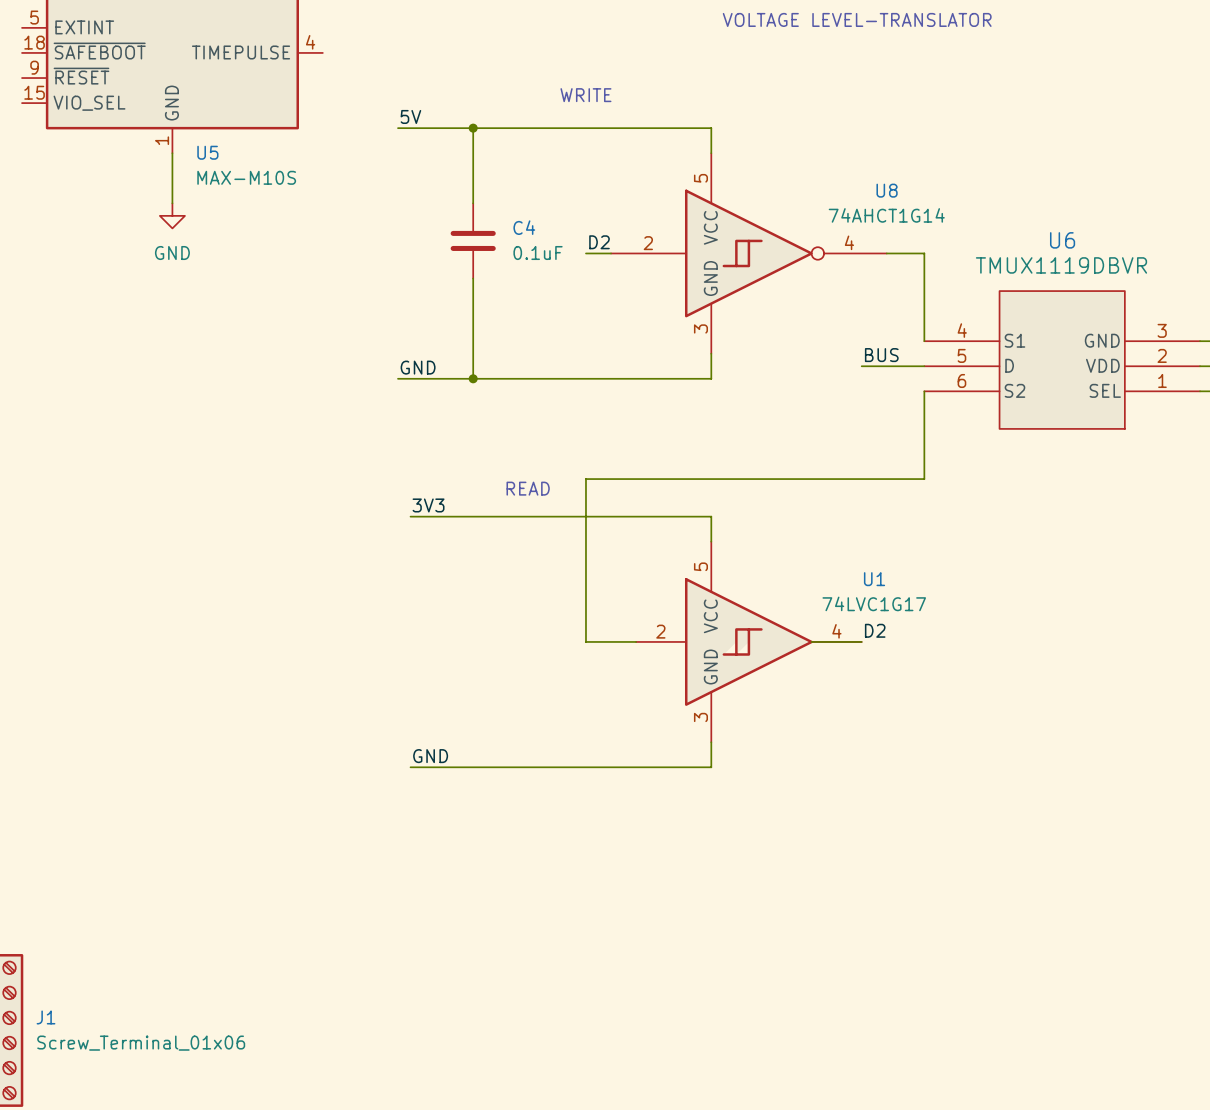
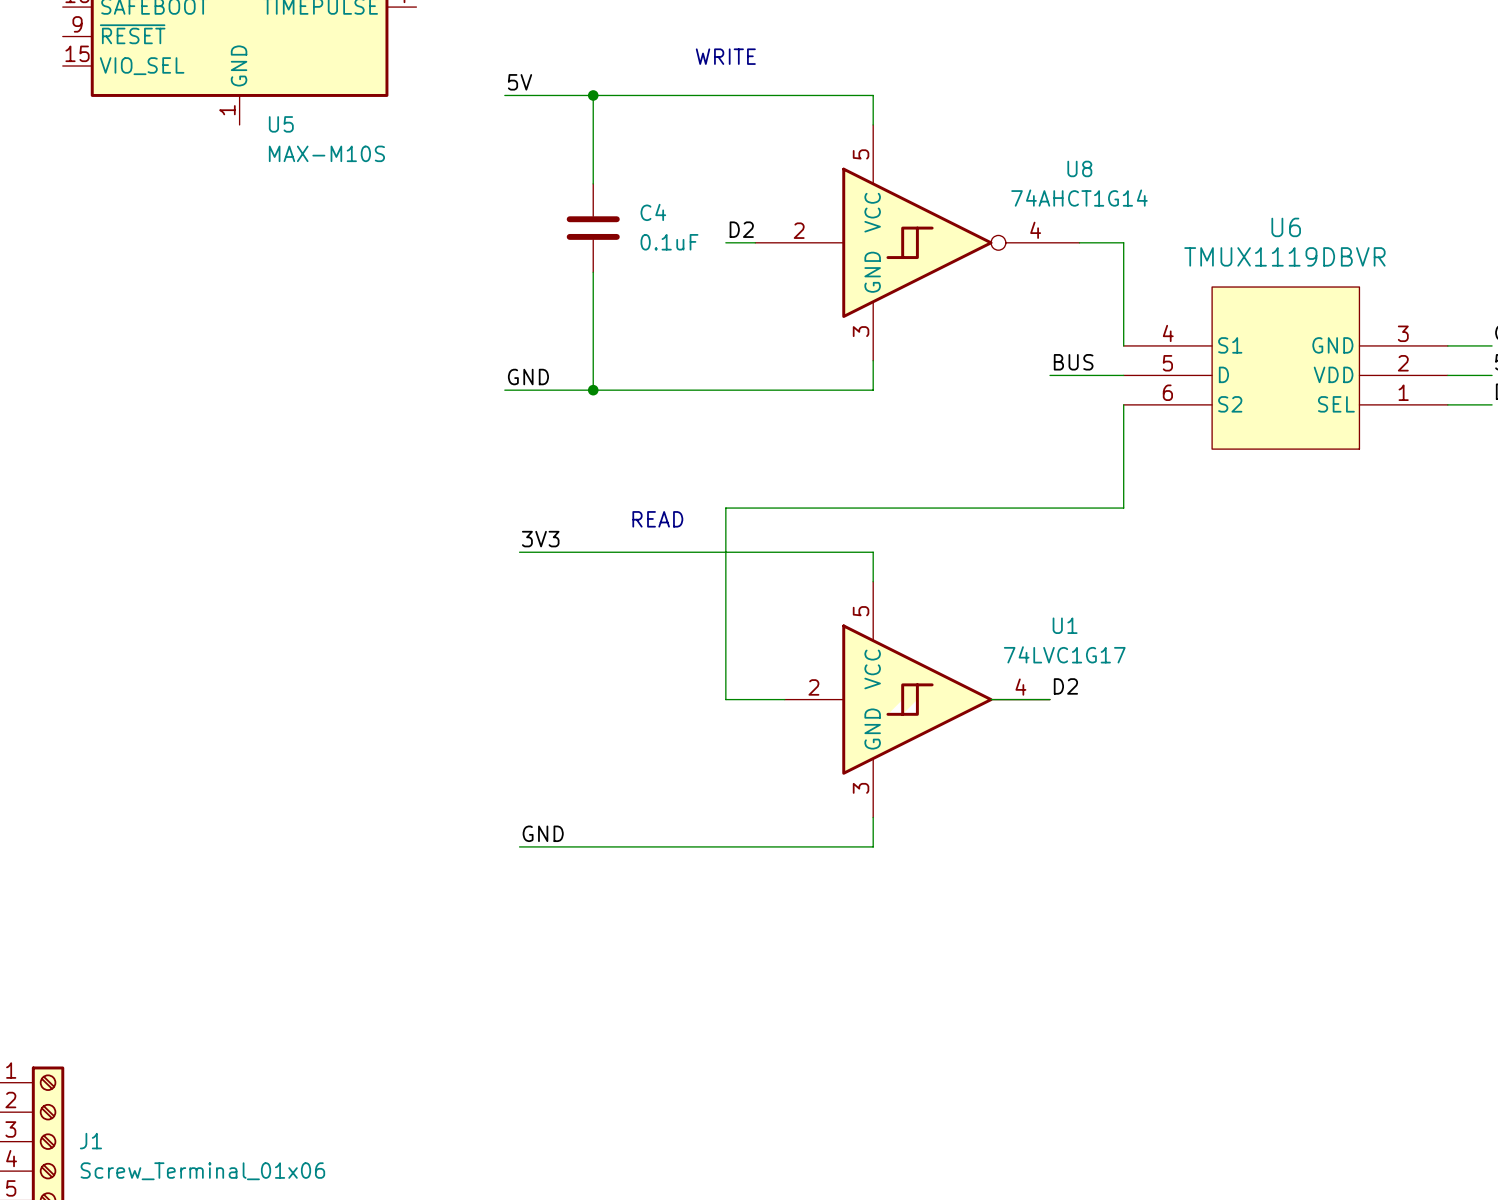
wire: (172, 153) (172, 203) -> none
power symbol: GND (172, 215) -> none

